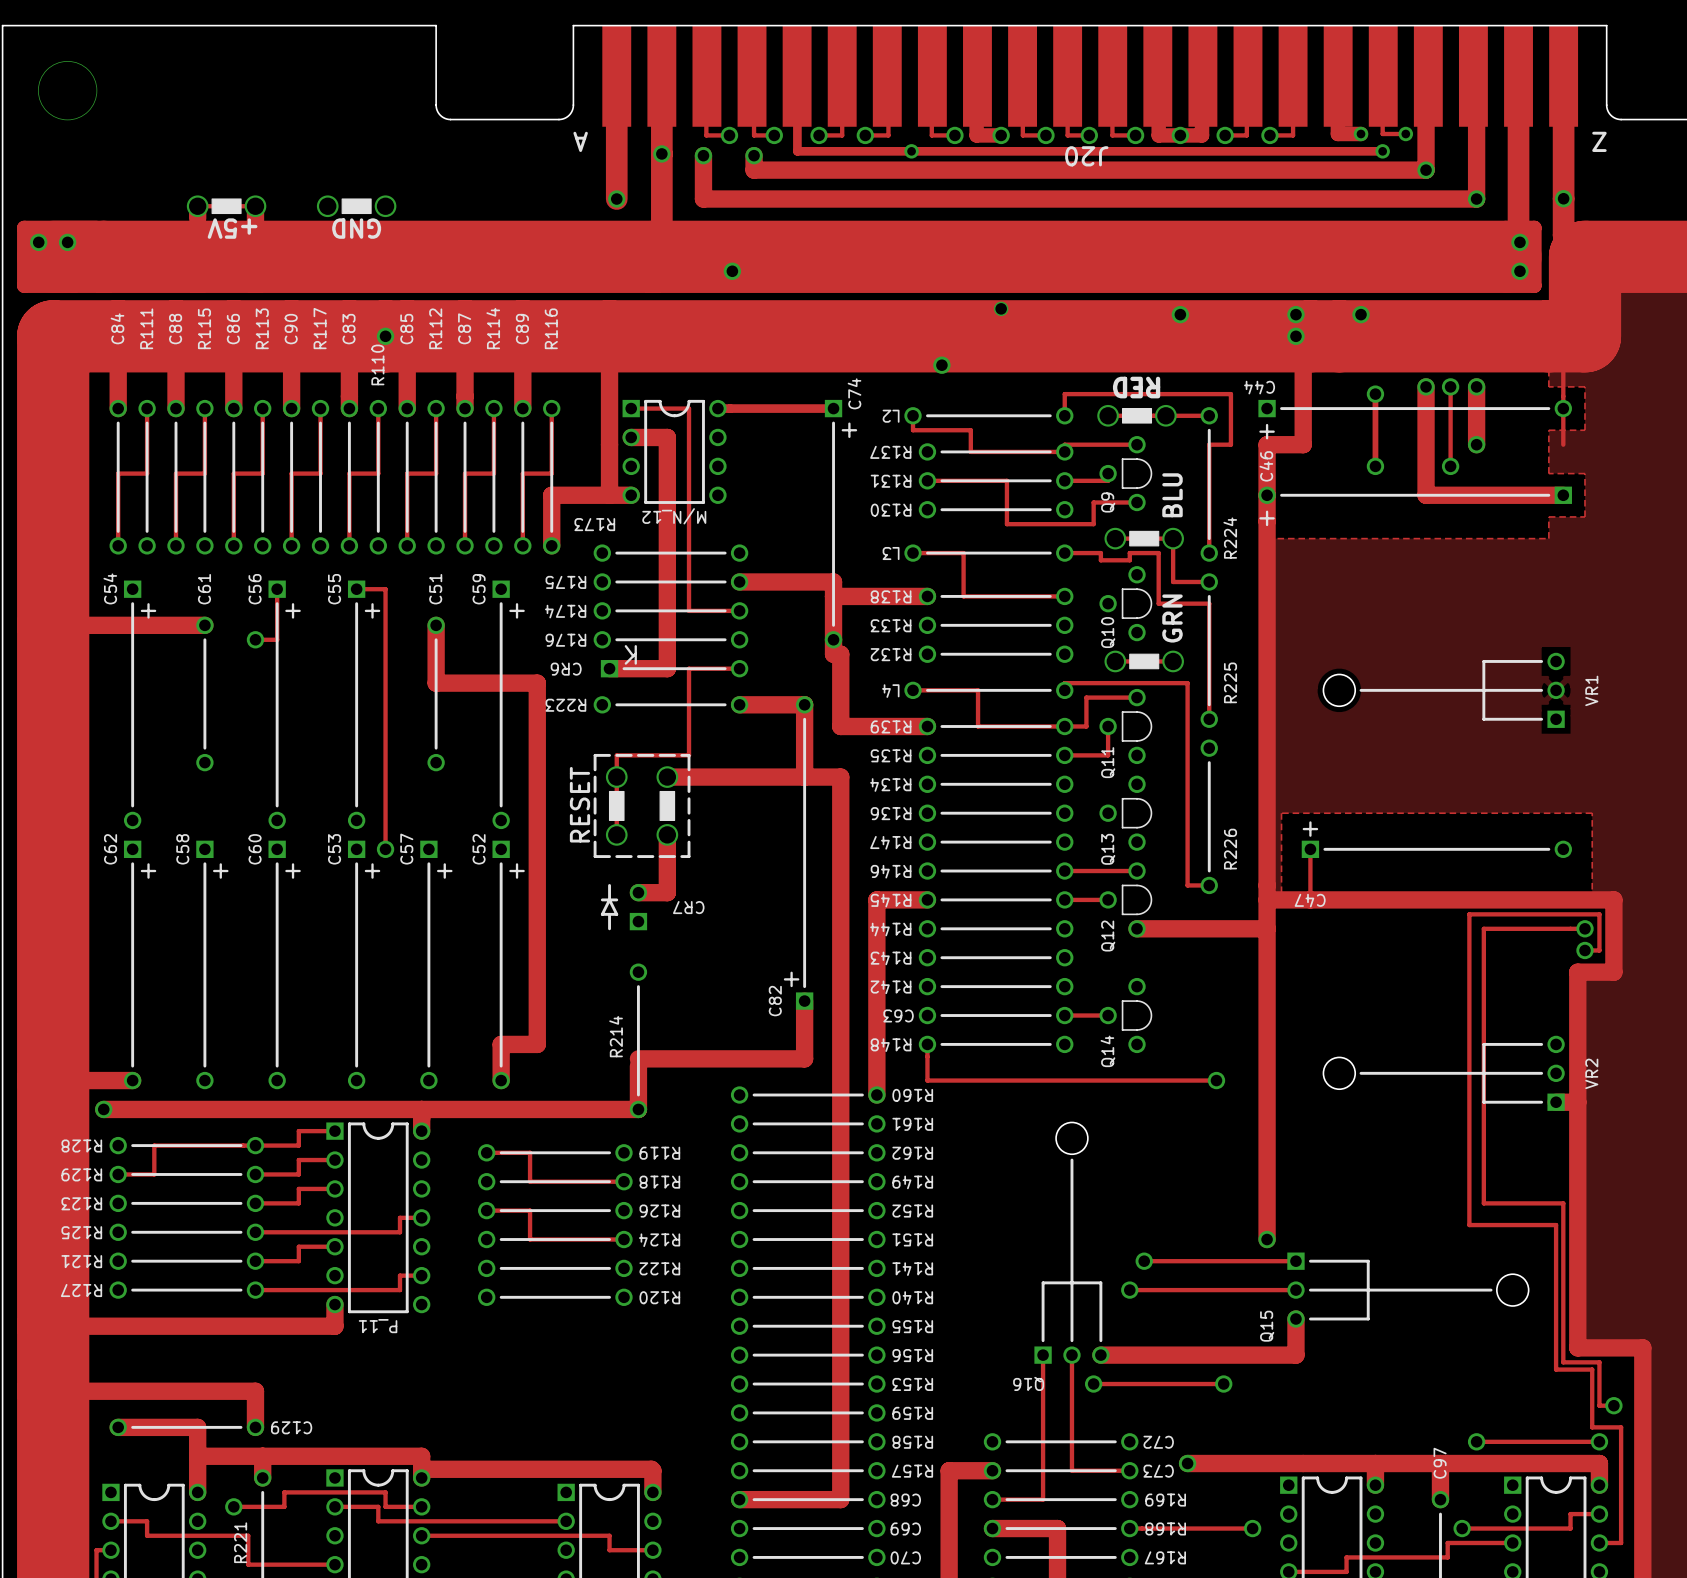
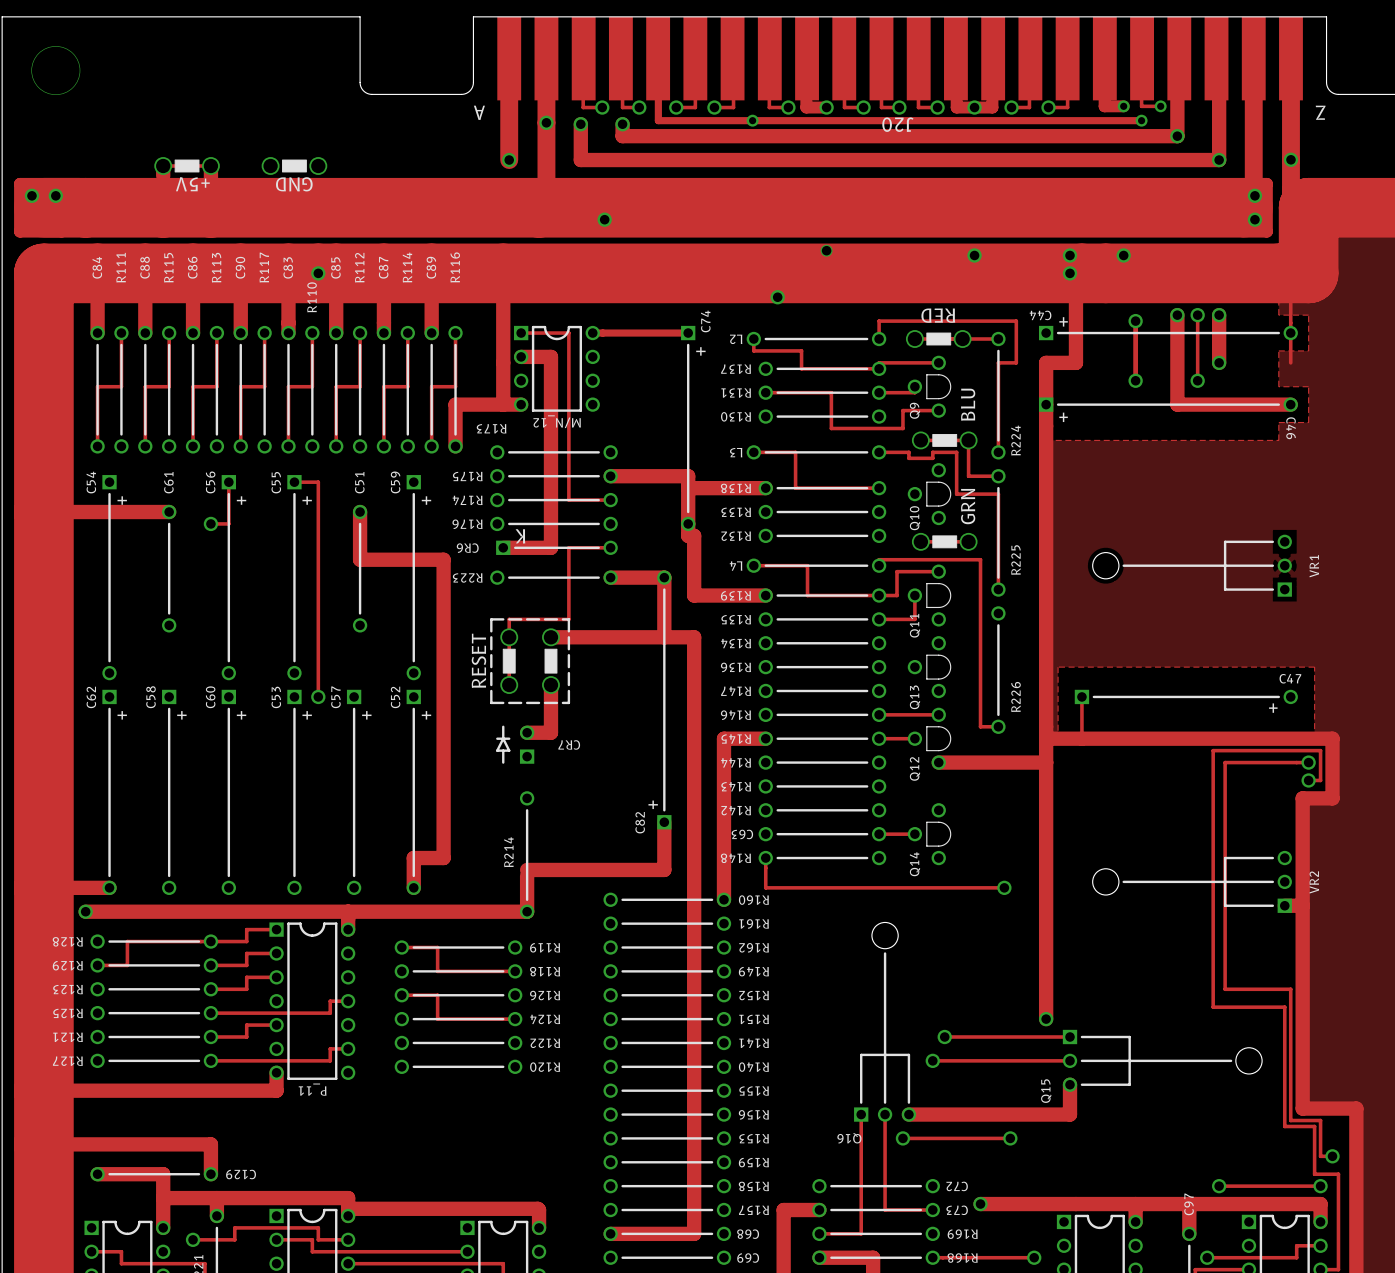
C44 text position: + (1267, 431) -> + (1063, 321)
C46 name position: C46 (1266, 466) -> C46 (1291, 428)
C46 footprint: [1258, 486, 1572, 504] -> [1038, 397, 1298, 412]
C47 text rotation: 0° (1310, 829) -> 180° (1273, 708)
C47 text position: + (1310, 829) -> + (1273, 708)
C47 name rotation: 0° (1310, 900) -> 180° (1290, 678)
C47 name position: C47 (1310, 900) -> C47 (1290, 678)

